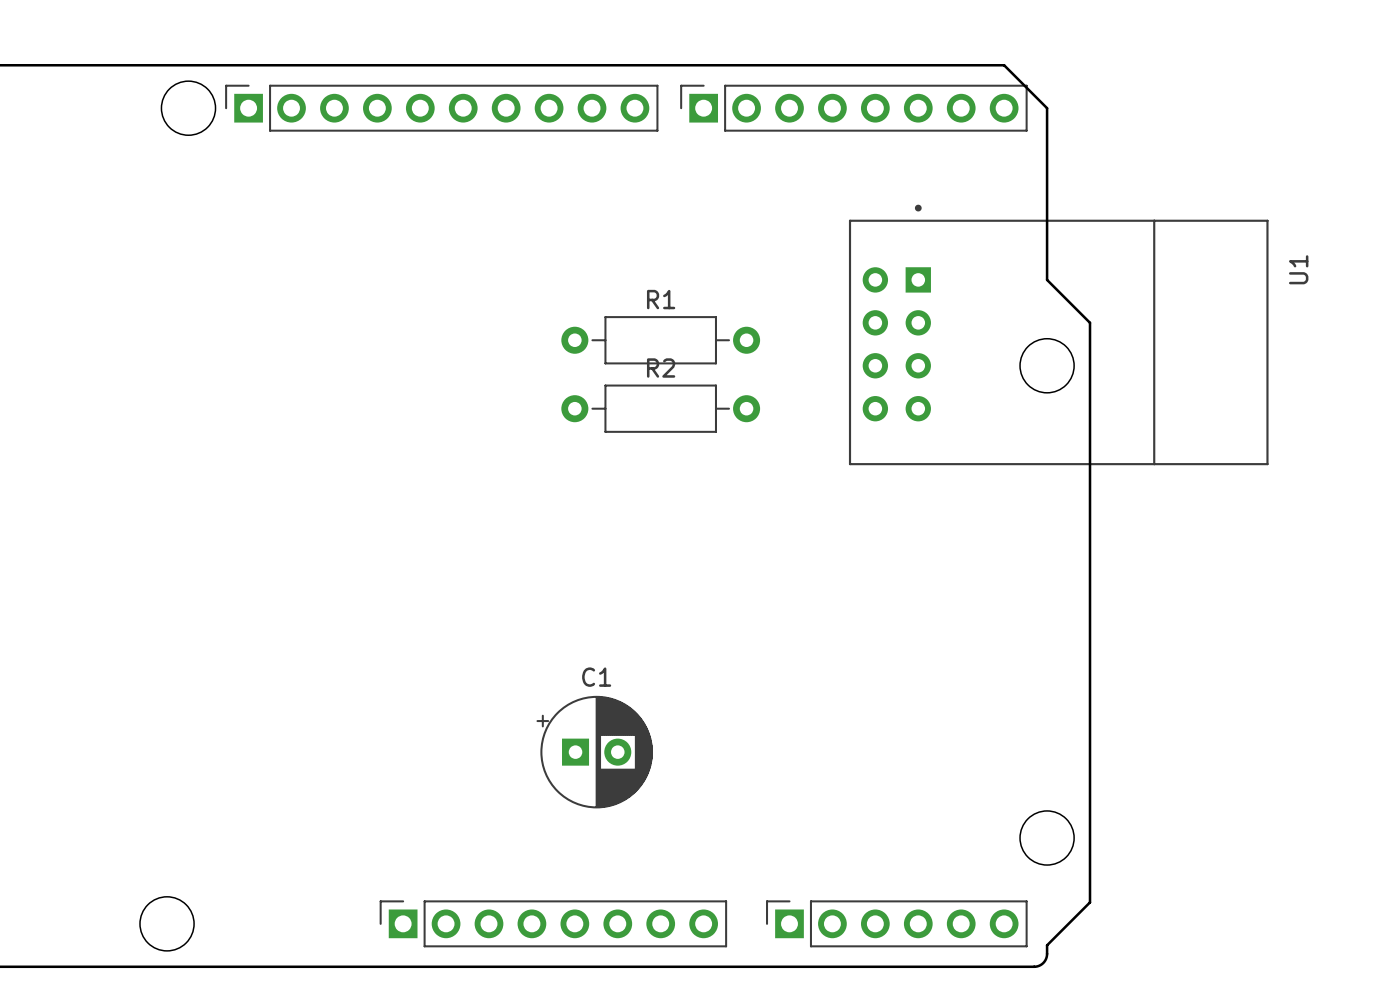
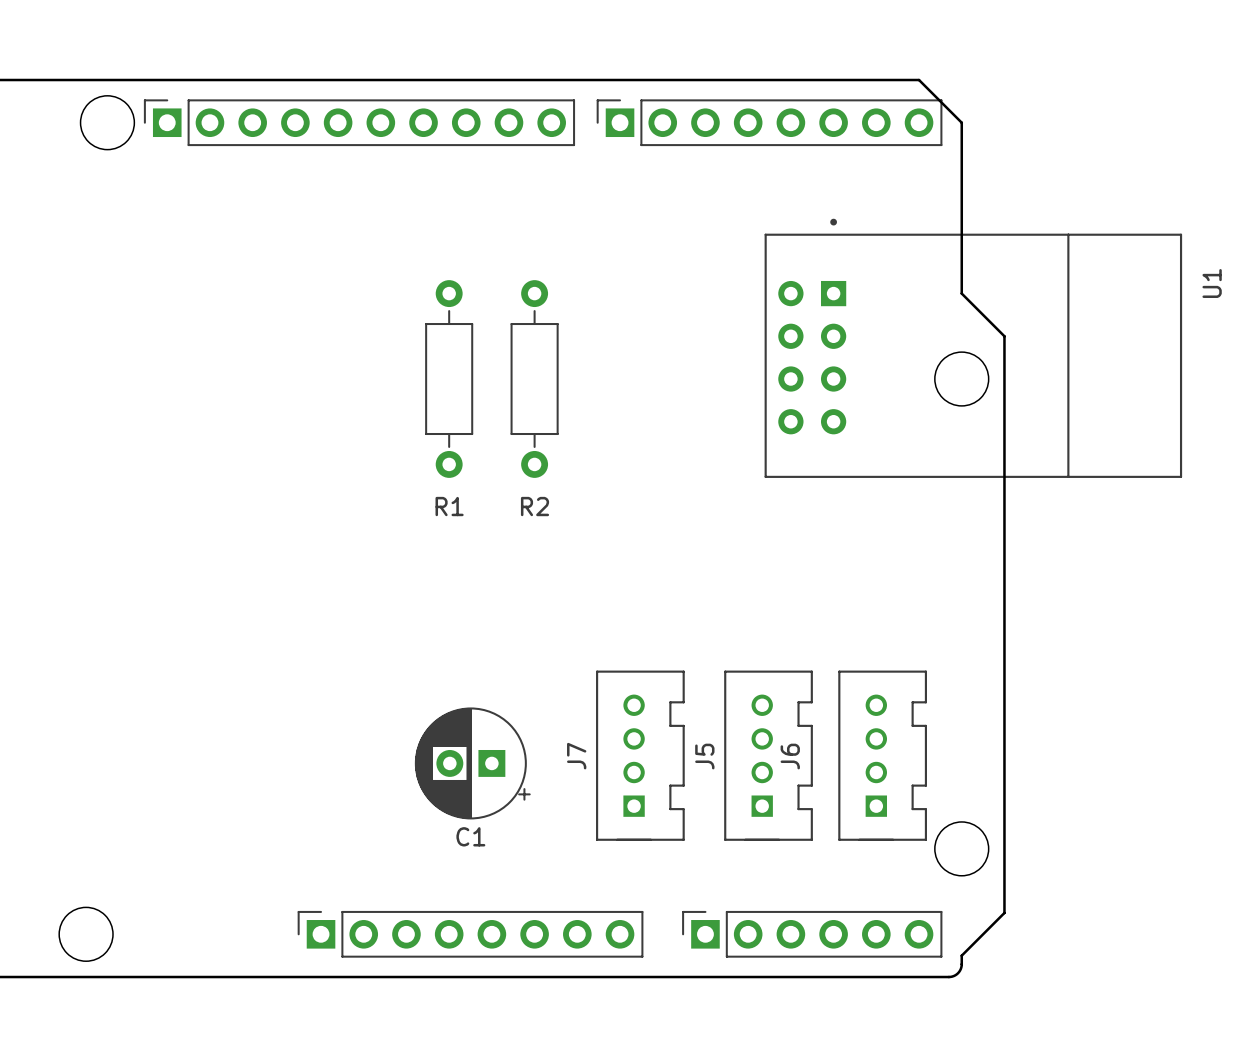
R1 name position: R1 (661, 299) -> R1 (449, 506)
R1 rotation: 0° (660, 340) -> 90° clockwise (449, 379)
R1 position: (660, 340) -> (449, 379)
R2 name position: R2 (661, 368) -> R2 (535, 506)
R2 rotation: 0° (660, 408) -> 90° clockwise (534, 379)
J7: none -> (640, 755)
J5: none -> (768, 755)
J6: none -> (882, 755)
C1 rotation: 0° (594, 752) -> 180° (472, 763)

